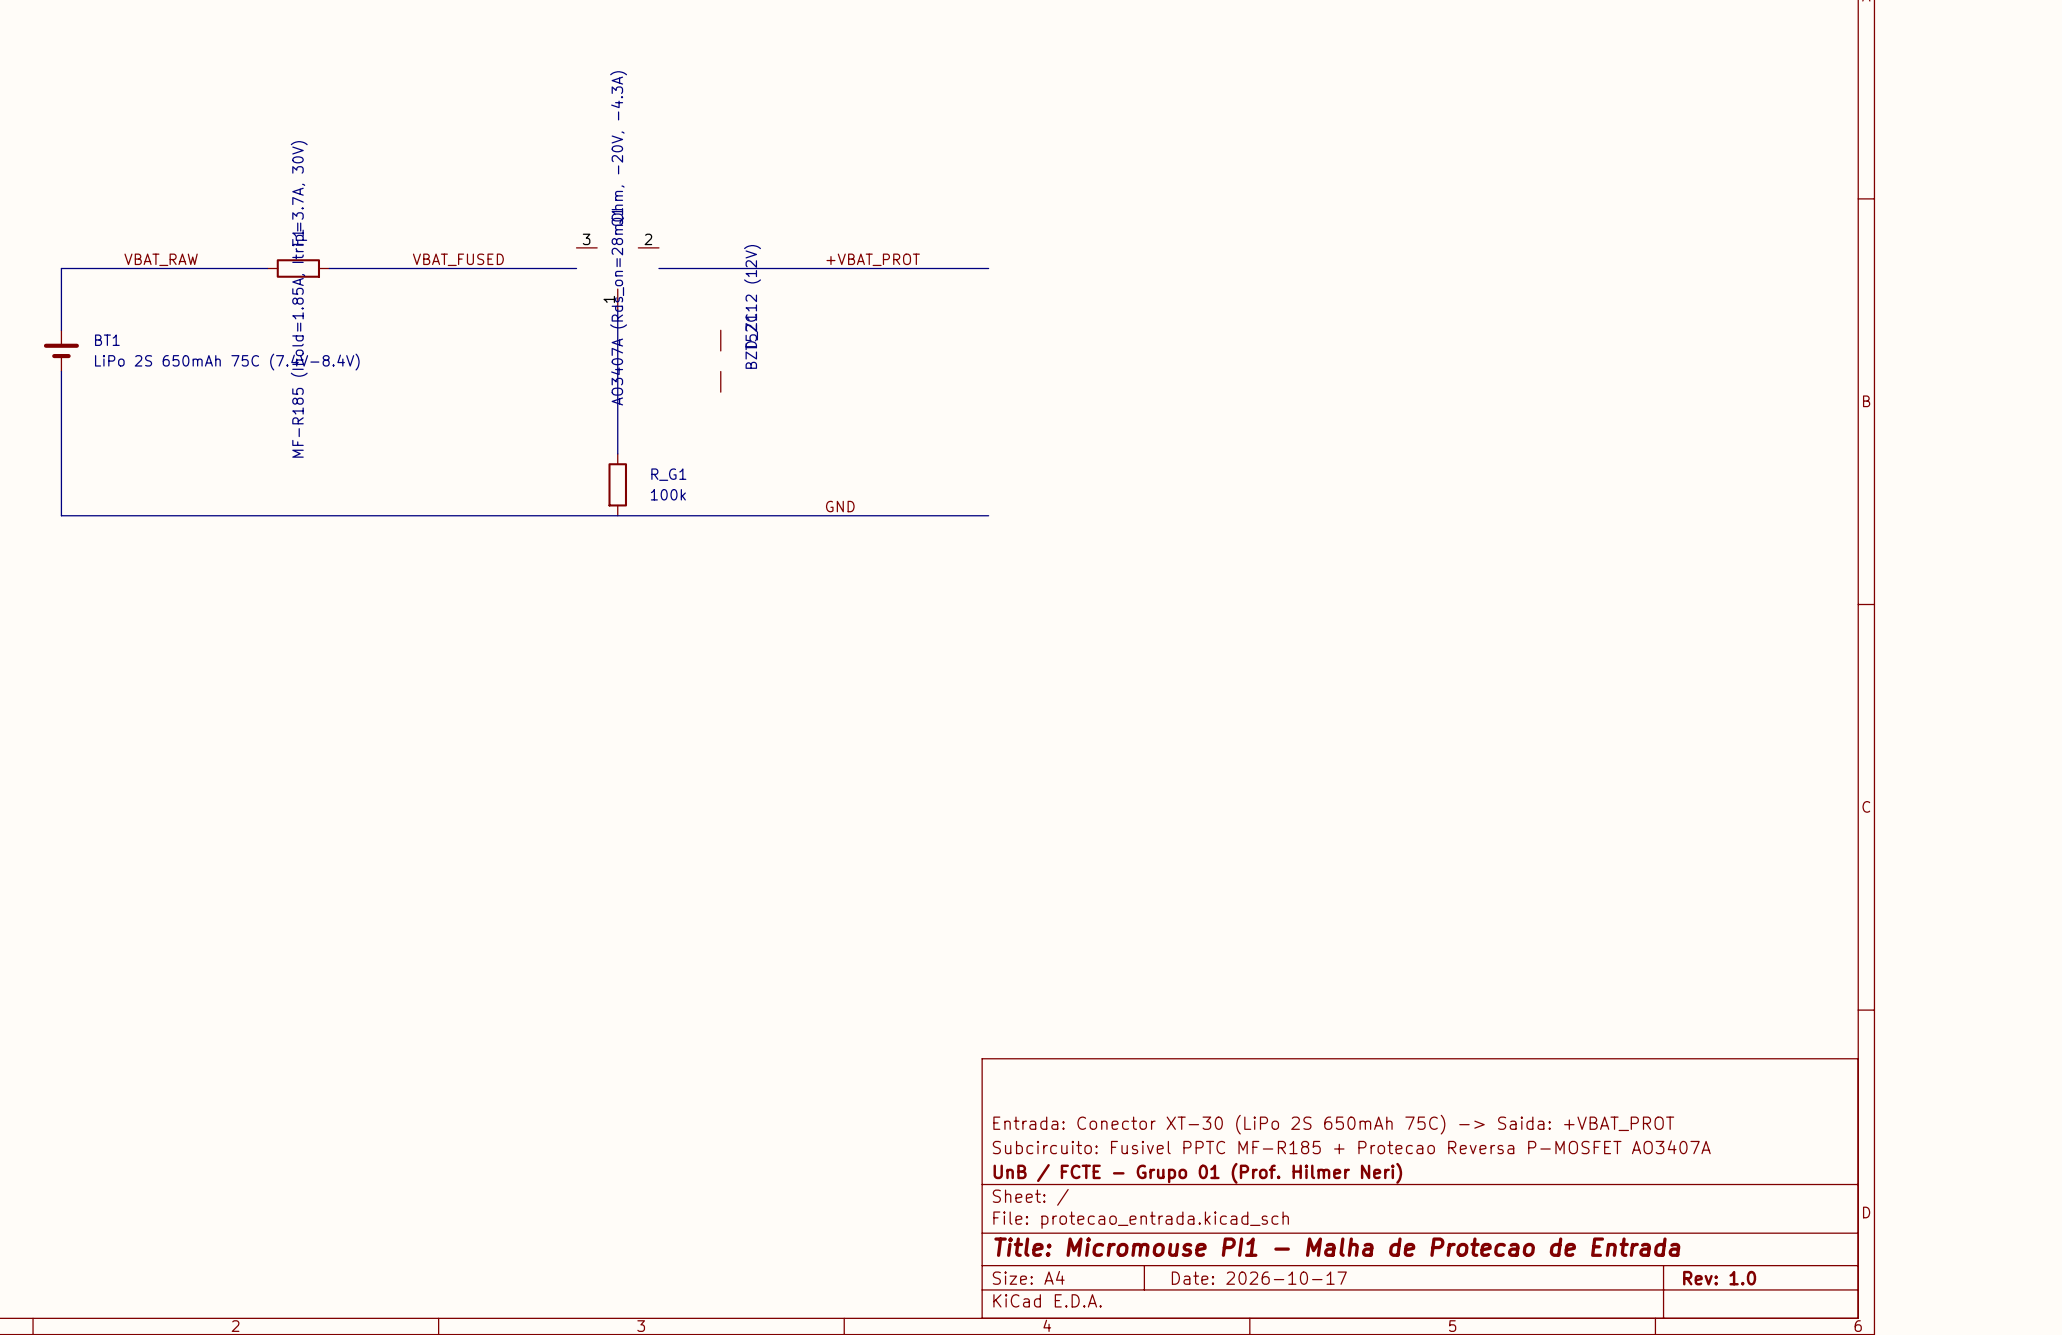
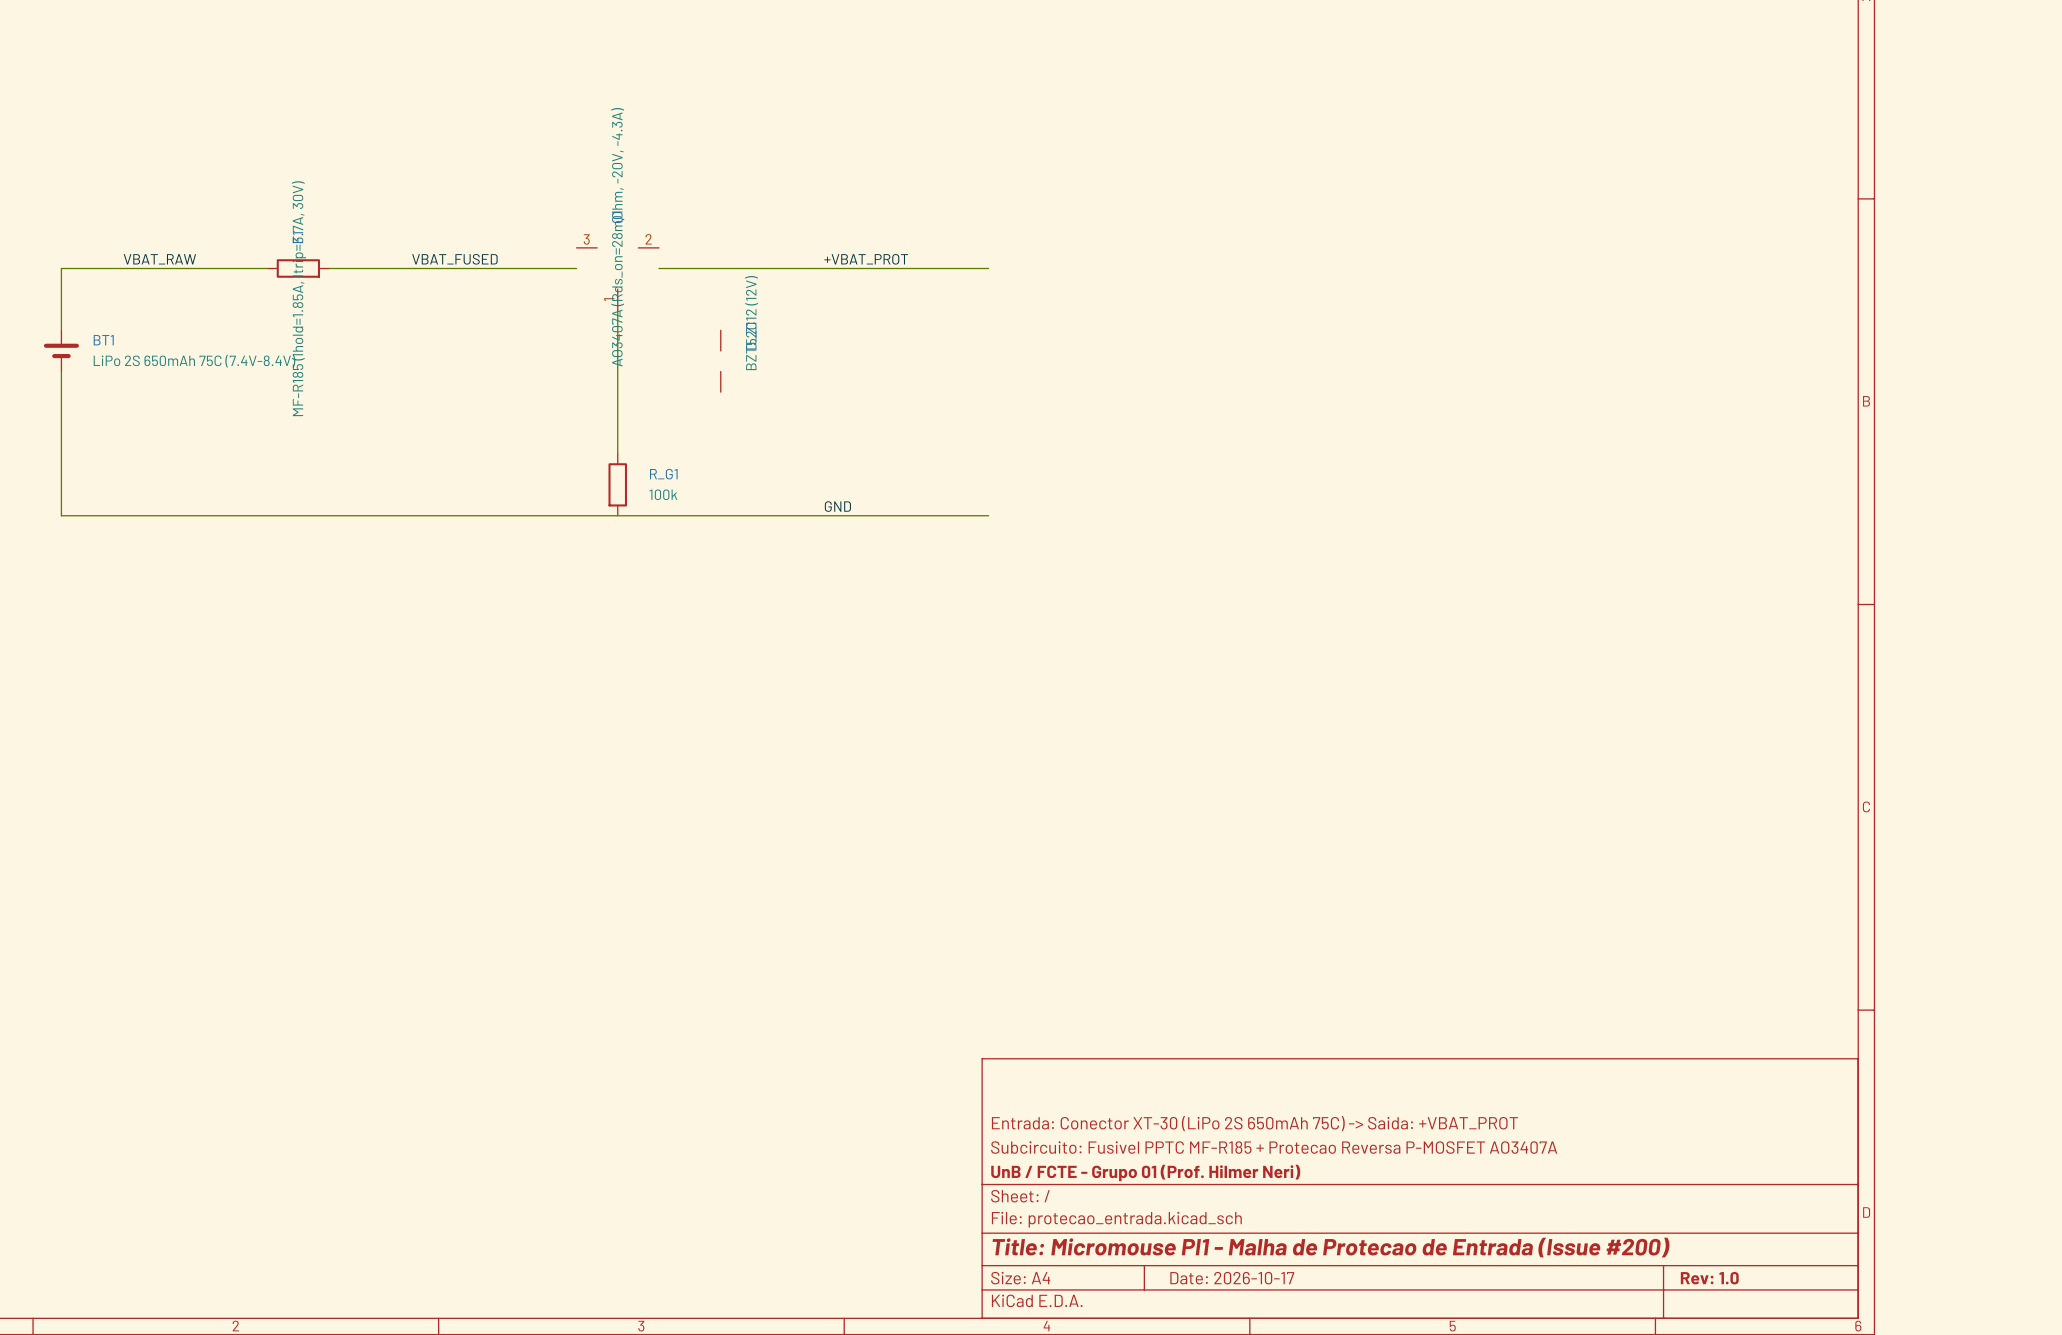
title block: Title: Micromouse PI1 - Malha de Protecao de Entrada (1337, 1247) -> Title: Micromouse PI1 - Malha de Protecao de Entrada (Issue #200) (1331, 1247)

